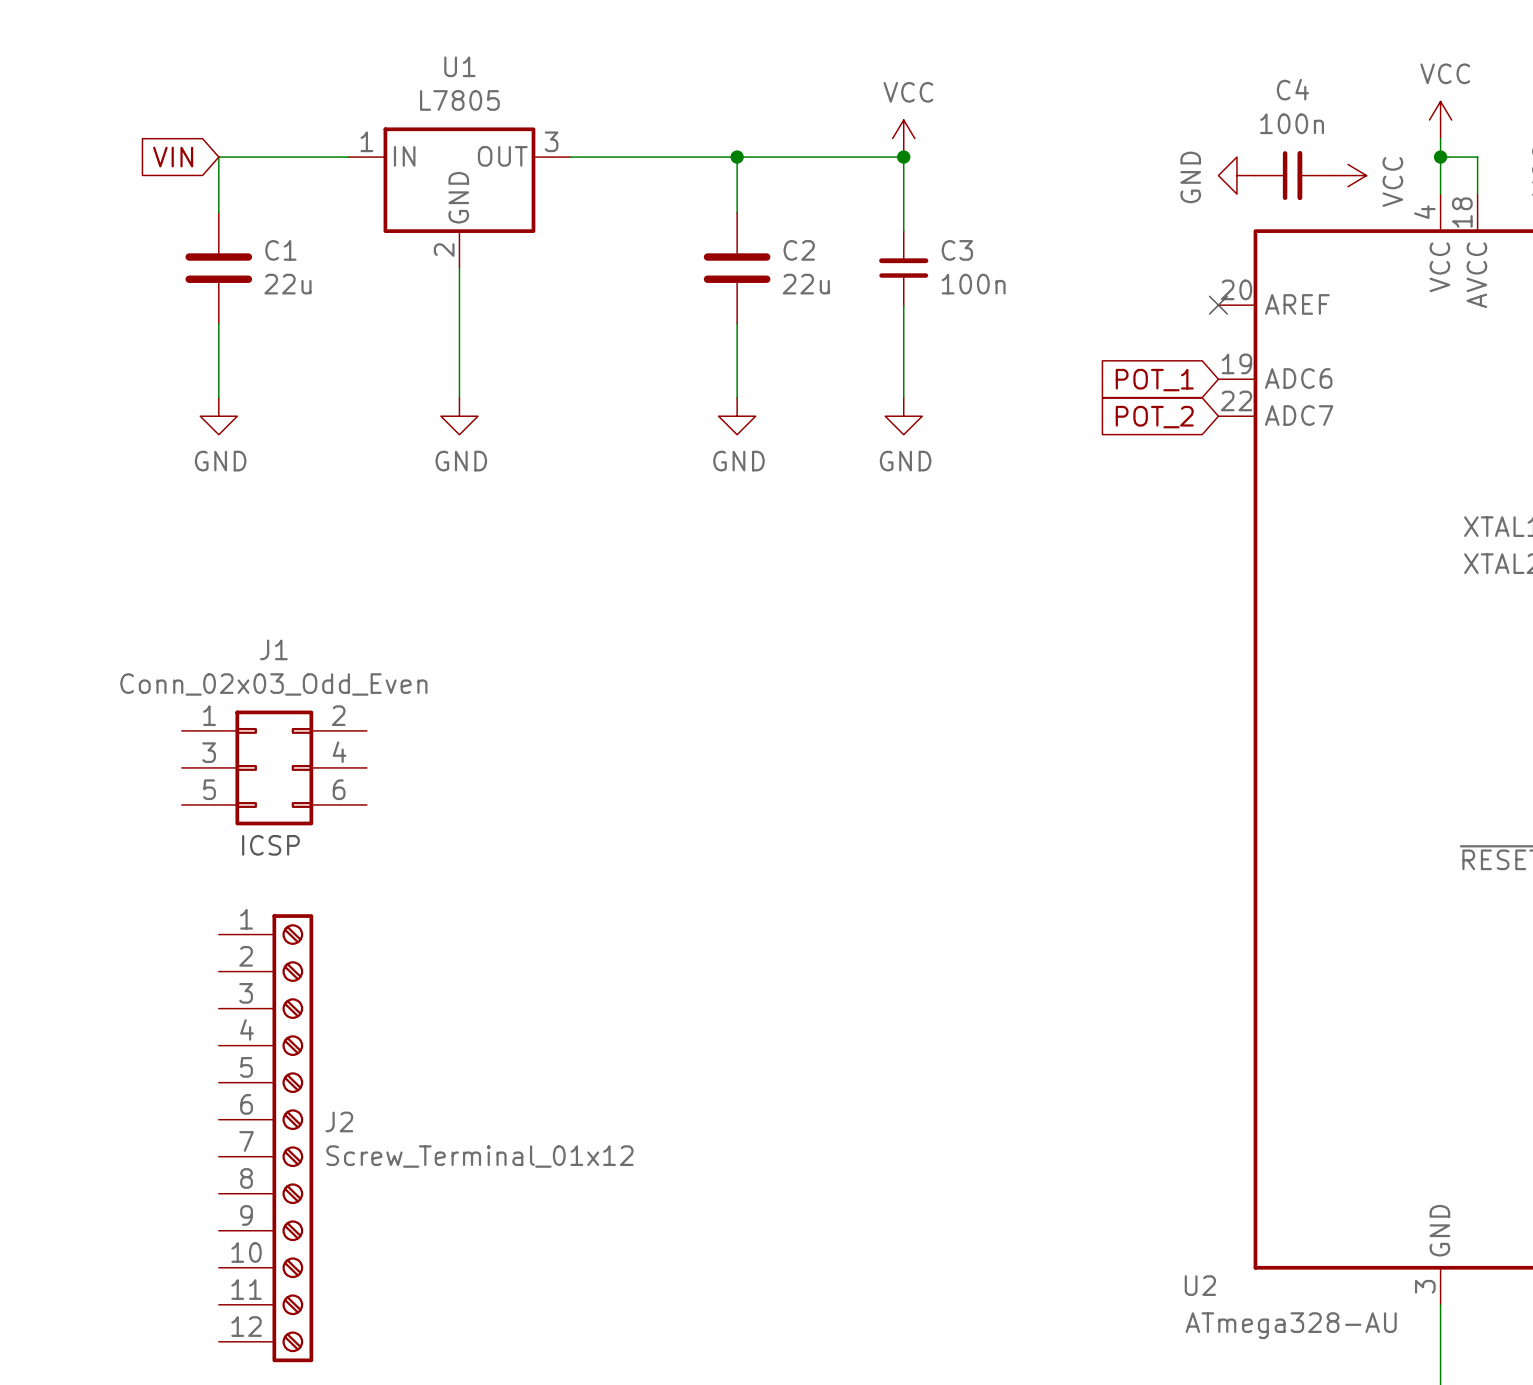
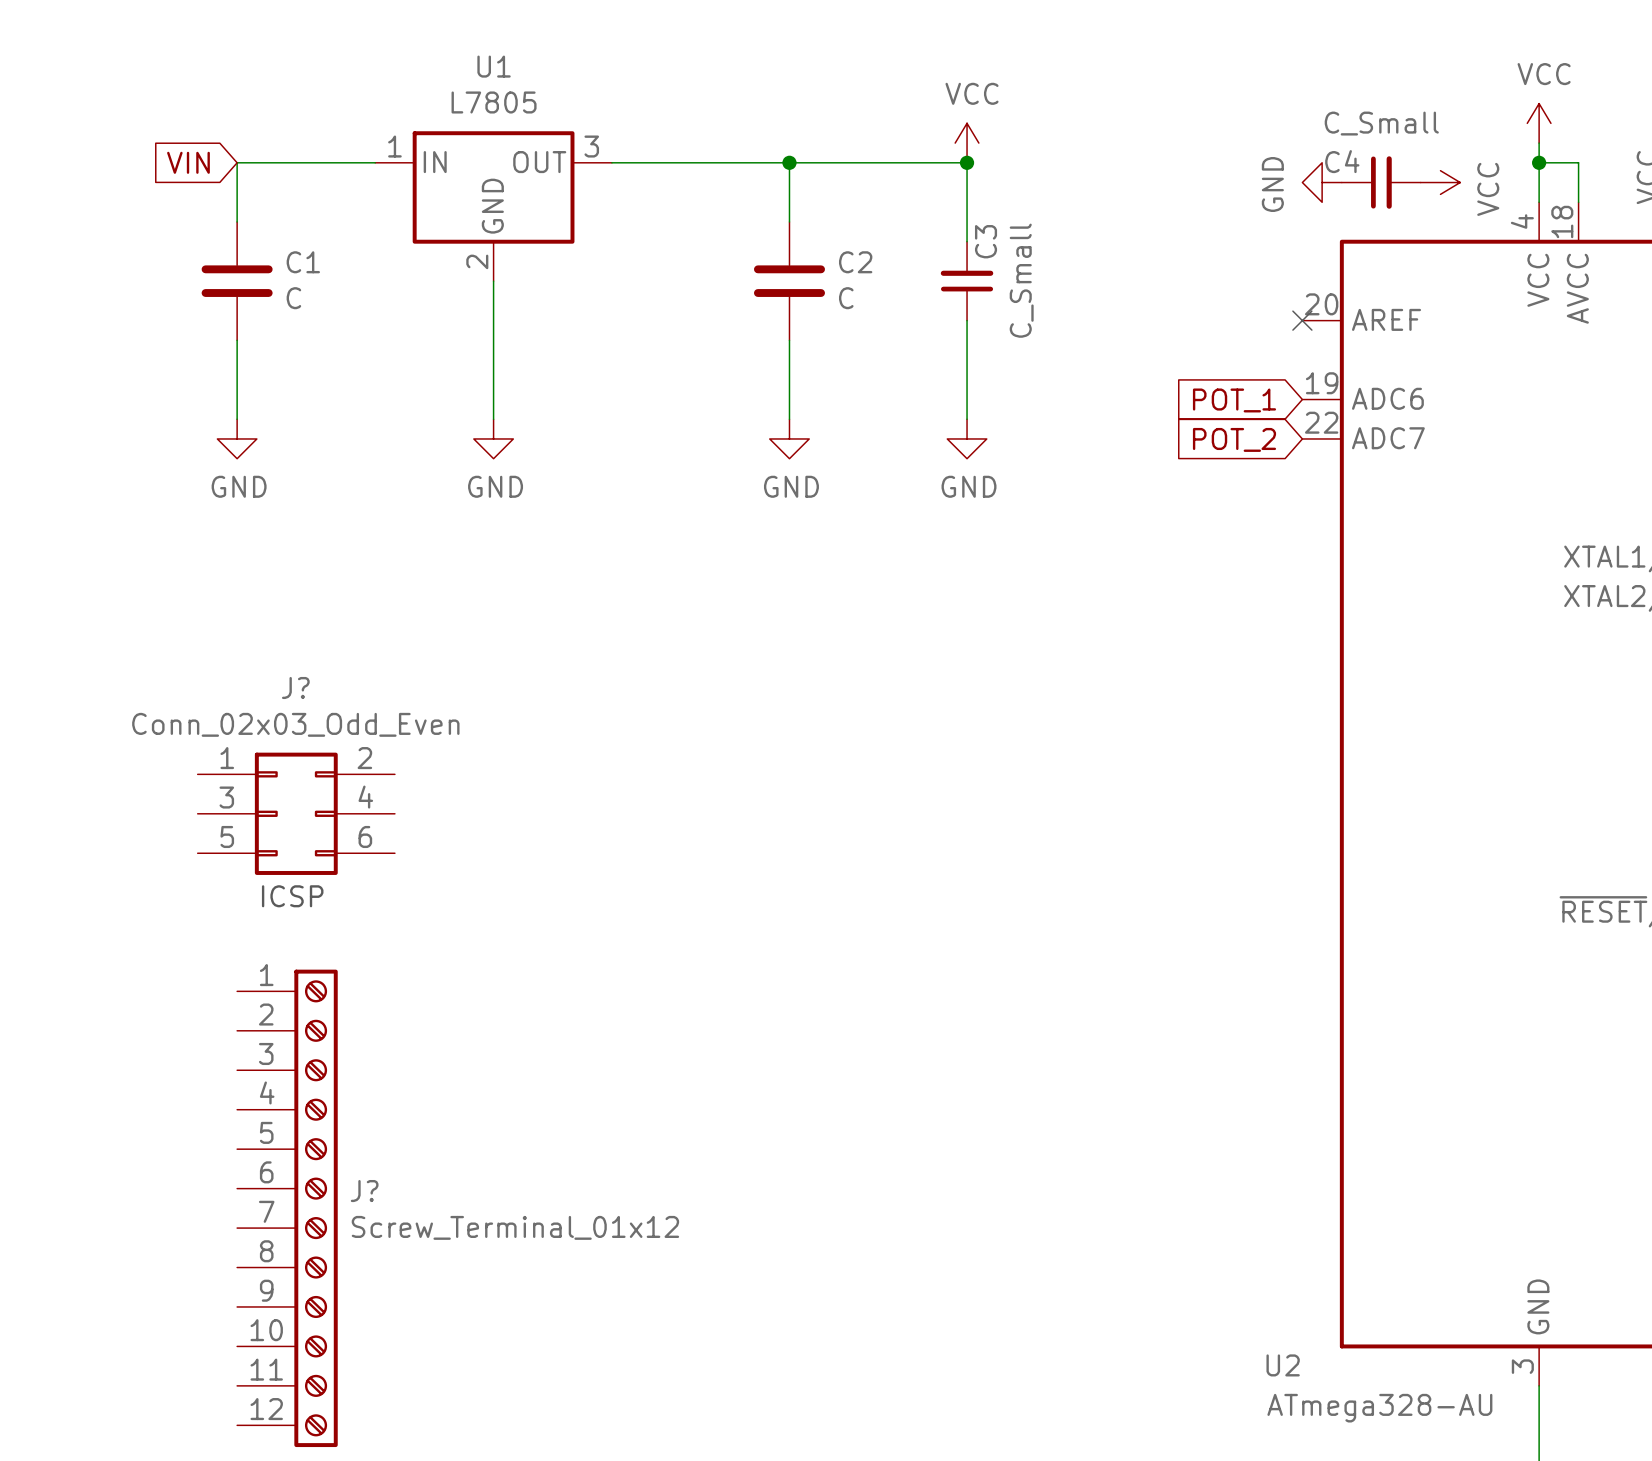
C4 name position: C4 (1292, 89) -> C4 (1342, 161)
C4 value: 100n (1292, 123) -> C_Small (1381, 123)
C3 name rotation: 0° (957, 250) -> 90° counterclockwise (986, 241)
C1 value: 22u (287, 284) -> C (293, 298)
C2 value: 22u (806, 284) -> C (846, 298)
C3 value: 100n (973, 284) -> C_Small (1021, 280)
J1 name: J1 (273, 649) -> J? (295, 687)
J2 name: J2 (339, 1121) -> J? (364, 1191)

